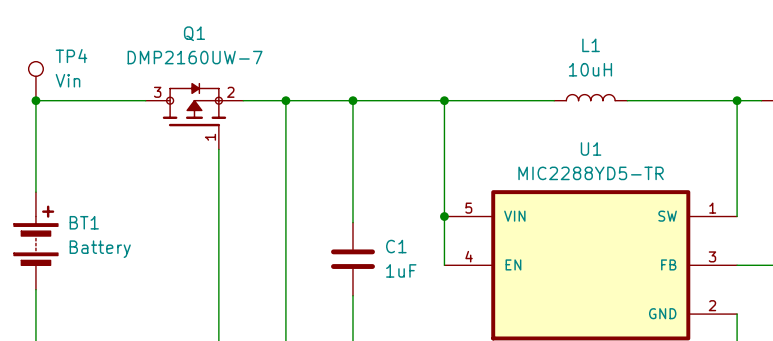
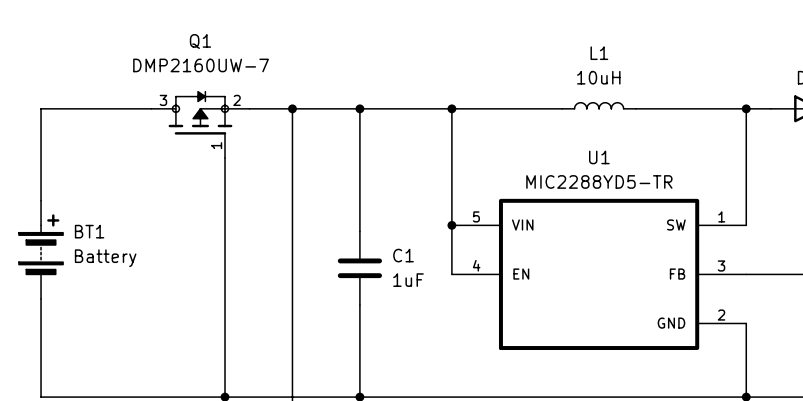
TP4: Vin (35, 81) -> none
junction: (35, 100) -> none

